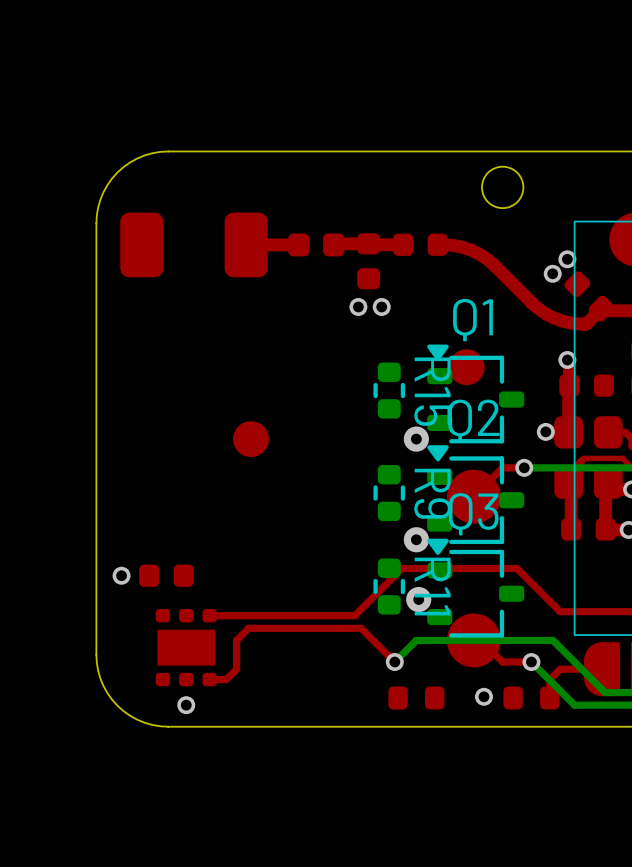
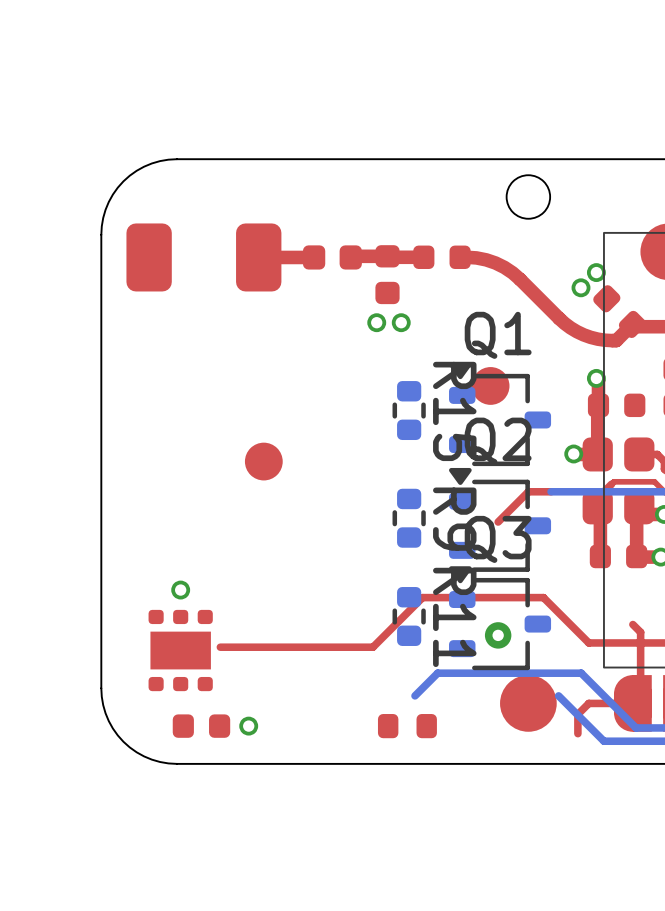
via: (416, 439) -> none
via: (524, 467) -> none
part: (473, 496) -> none
via: (416, 539) -> none
via position: (121, 575) -> (180, 590)
part position: (166, 575) -> (201, 726)
top track: none -> (632, 624) (640, 632) (640, 694)
via: (418, 599) -> none
via: none -> (498, 635)
top track: (473, 640) (481, 647) (488, 647) (502, 662) (531, 662) -> none
part position: (473, 640) -> (528, 703)
part position: (186, 647) -> (180, 650)
top track: (394, 662) (361, 628) (248, 628) (236, 640) (236, 669) (226, 679) (209, 679) -> none
via: (394, 662) -> none
via: (531, 662) -> none
via: (483, 696) -> none
part position: (416, 697) -> (407, 726)
part: (531, 697) -> none
via position: (186, 705) -> (248, 726)

